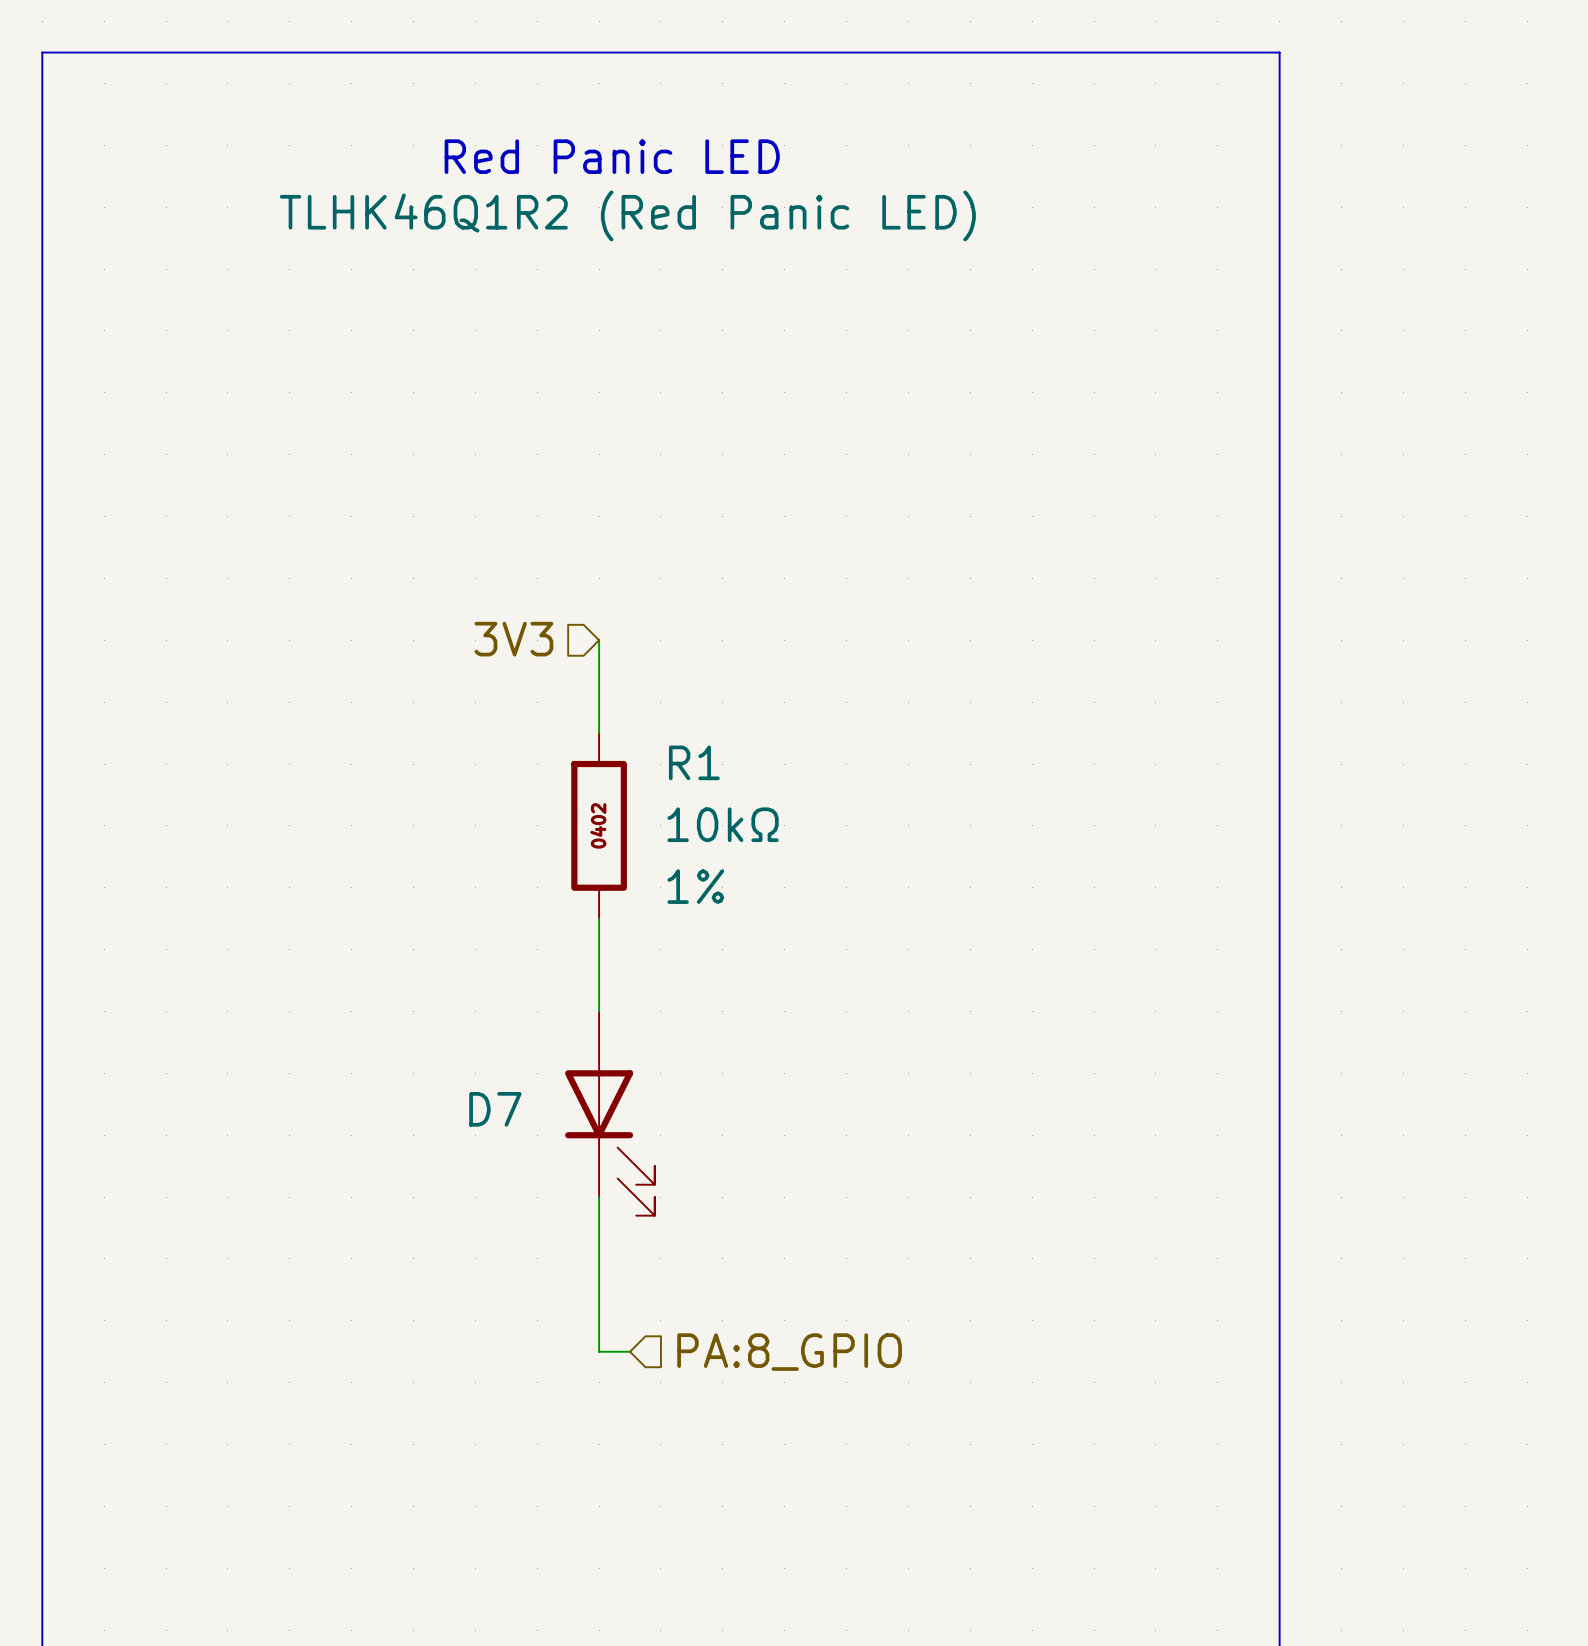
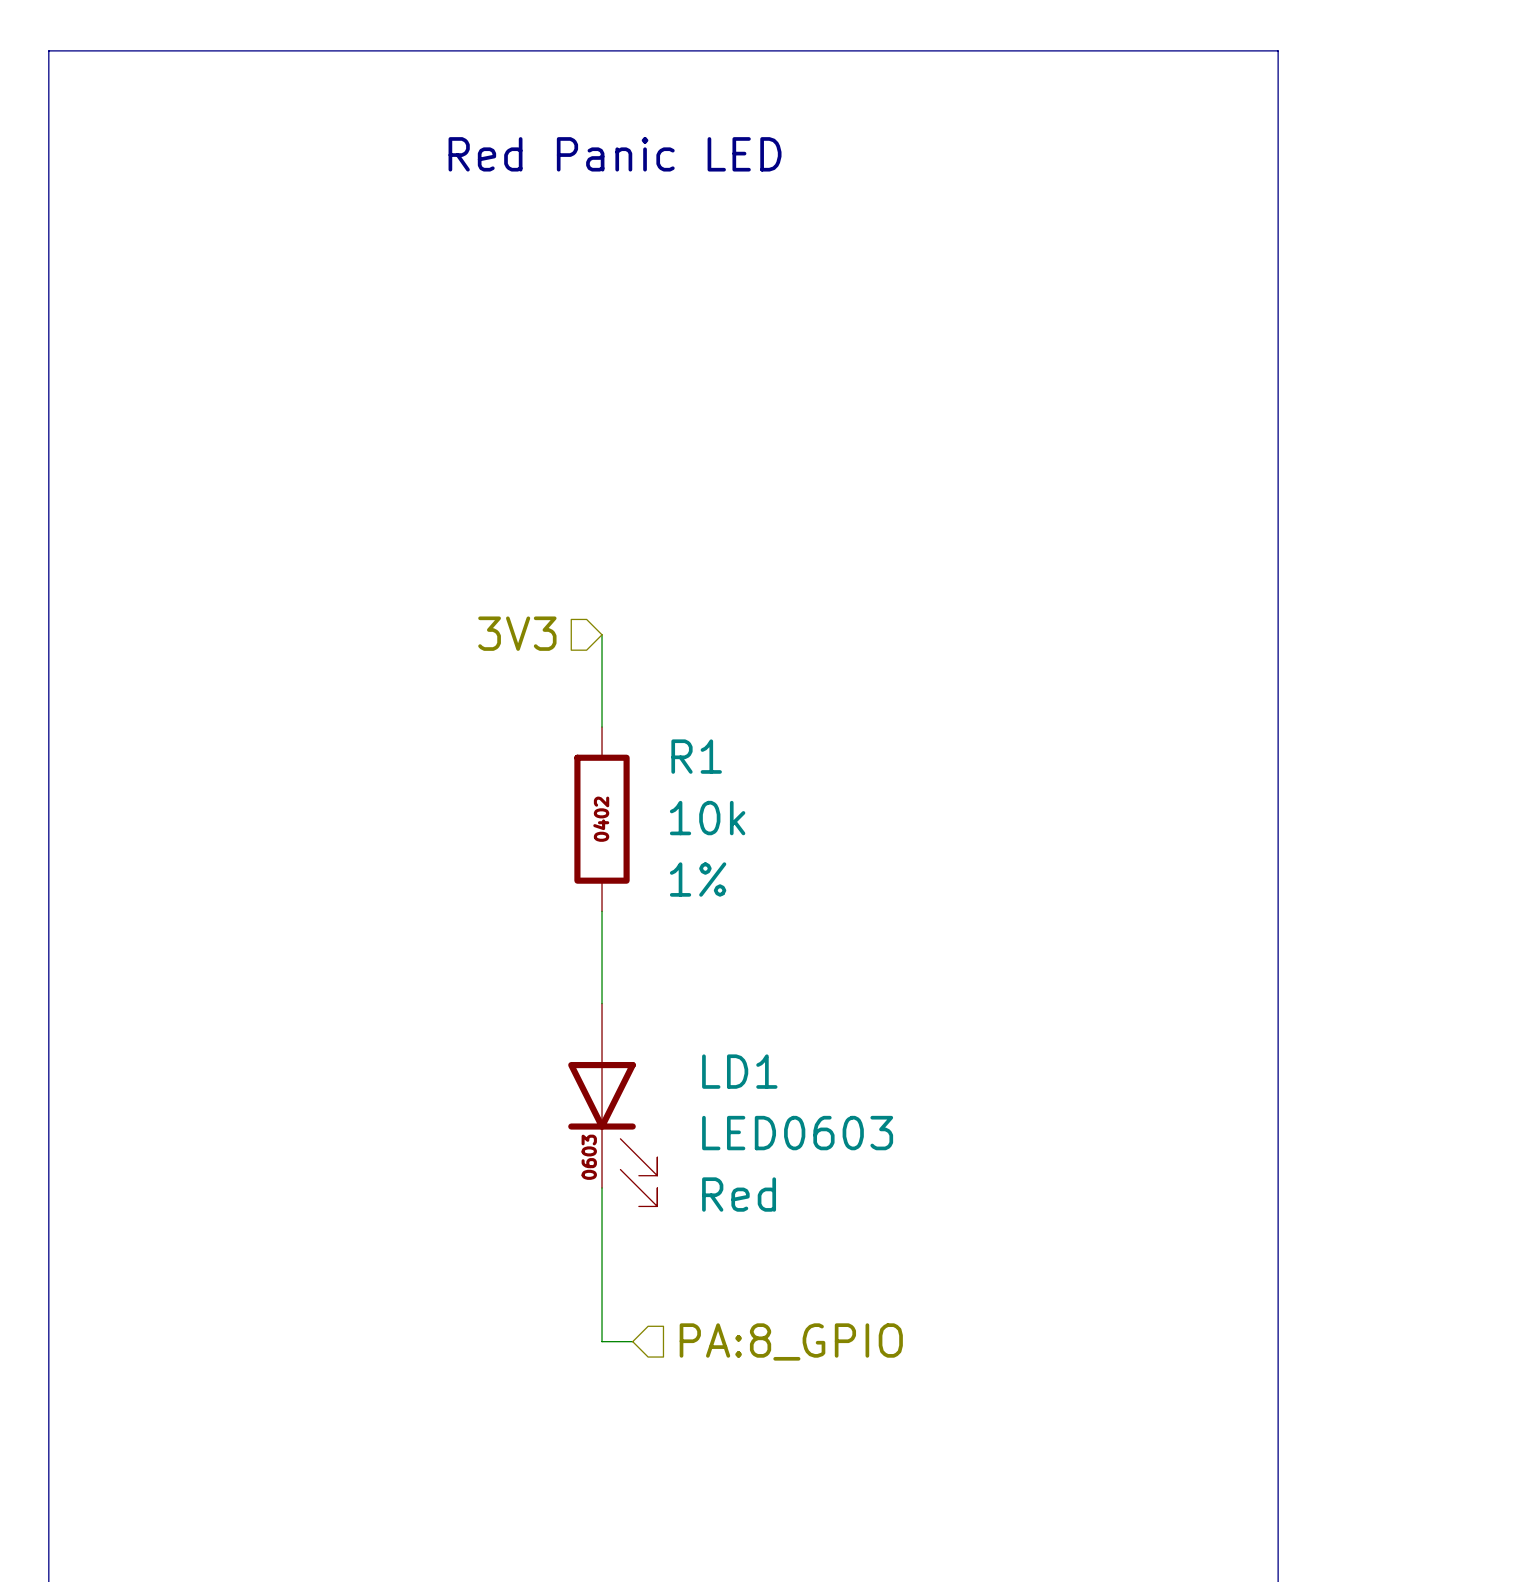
D7 value: TLHK46Q1R2 (Red Panic LED) (627, 215) -> LED0603 (797, 1133)
R1 value: 10kΩ (723, 824) -> 10k (707, 818)
D7 name: D7 (495, 1109) -> LD1 (739, 1071)
D7 text: none -> 0603 (589, 1157)
D7 text: none -> Red (739, 1194)

